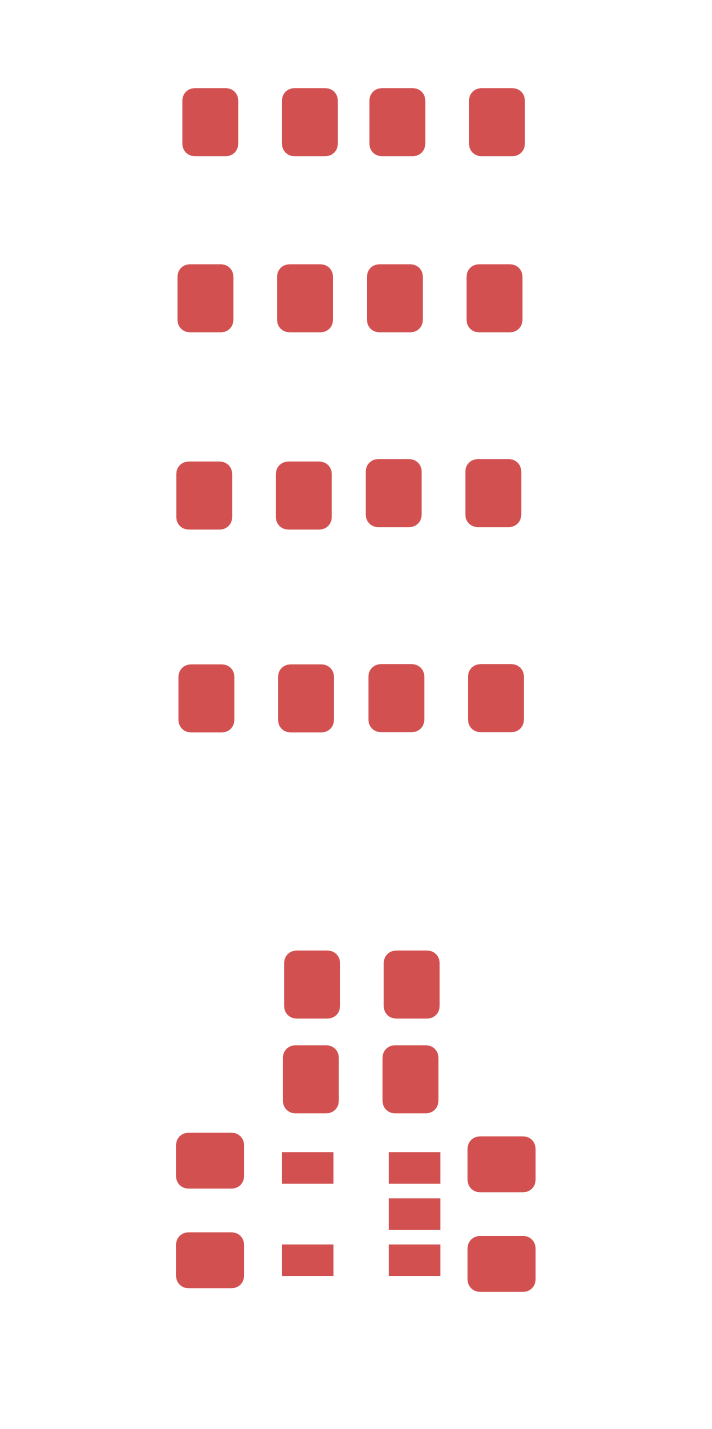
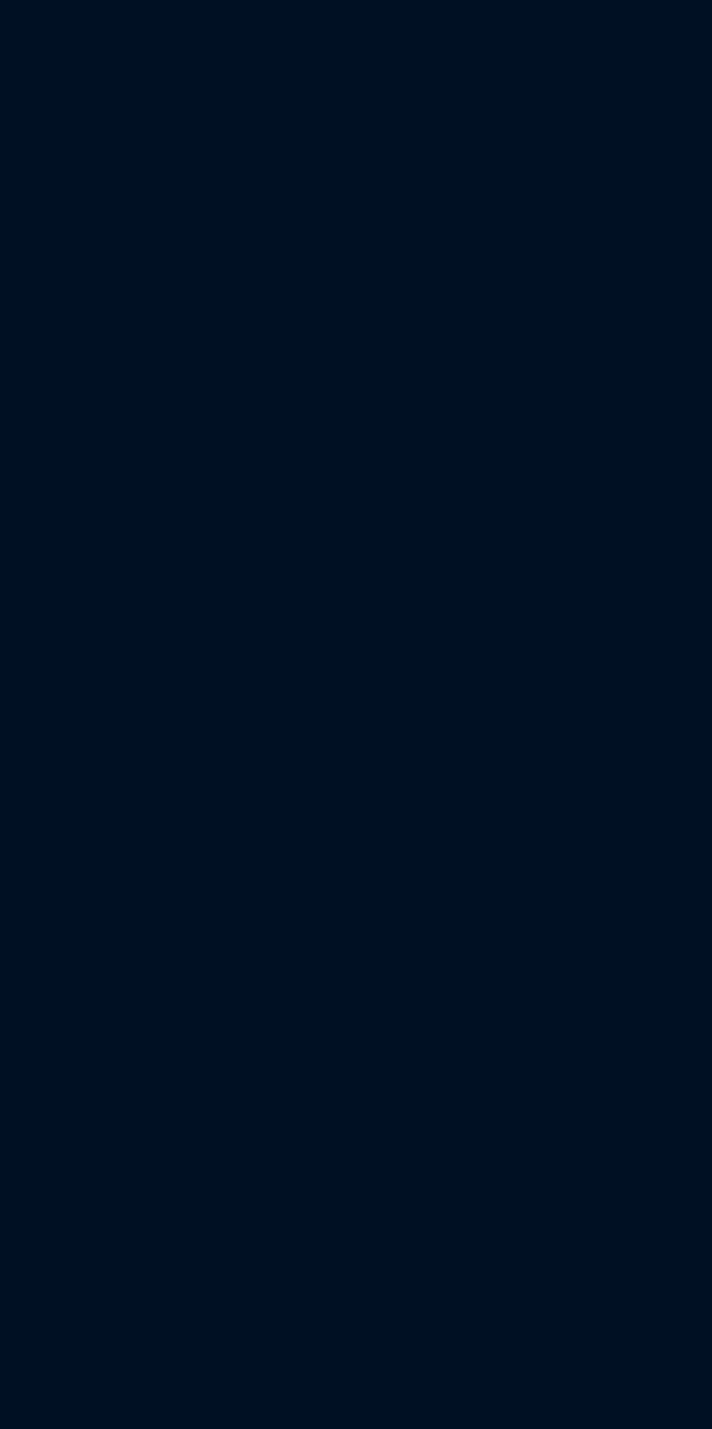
part: (260, 122) -> none
part: (447, 122) -> none
part: (255, 298) -> none
part: (444, 298) -> none
part: (443, 493) -> none
part: (254, 495) -> none
part: (256, 698) -> none
part: (446, 698) -> none
part: (361, 984) -> none
part: (360, 1079) -> none
part: (210, 1210) -> none
part: (361, 1214) -> none
part: (501, 1214) -> none

